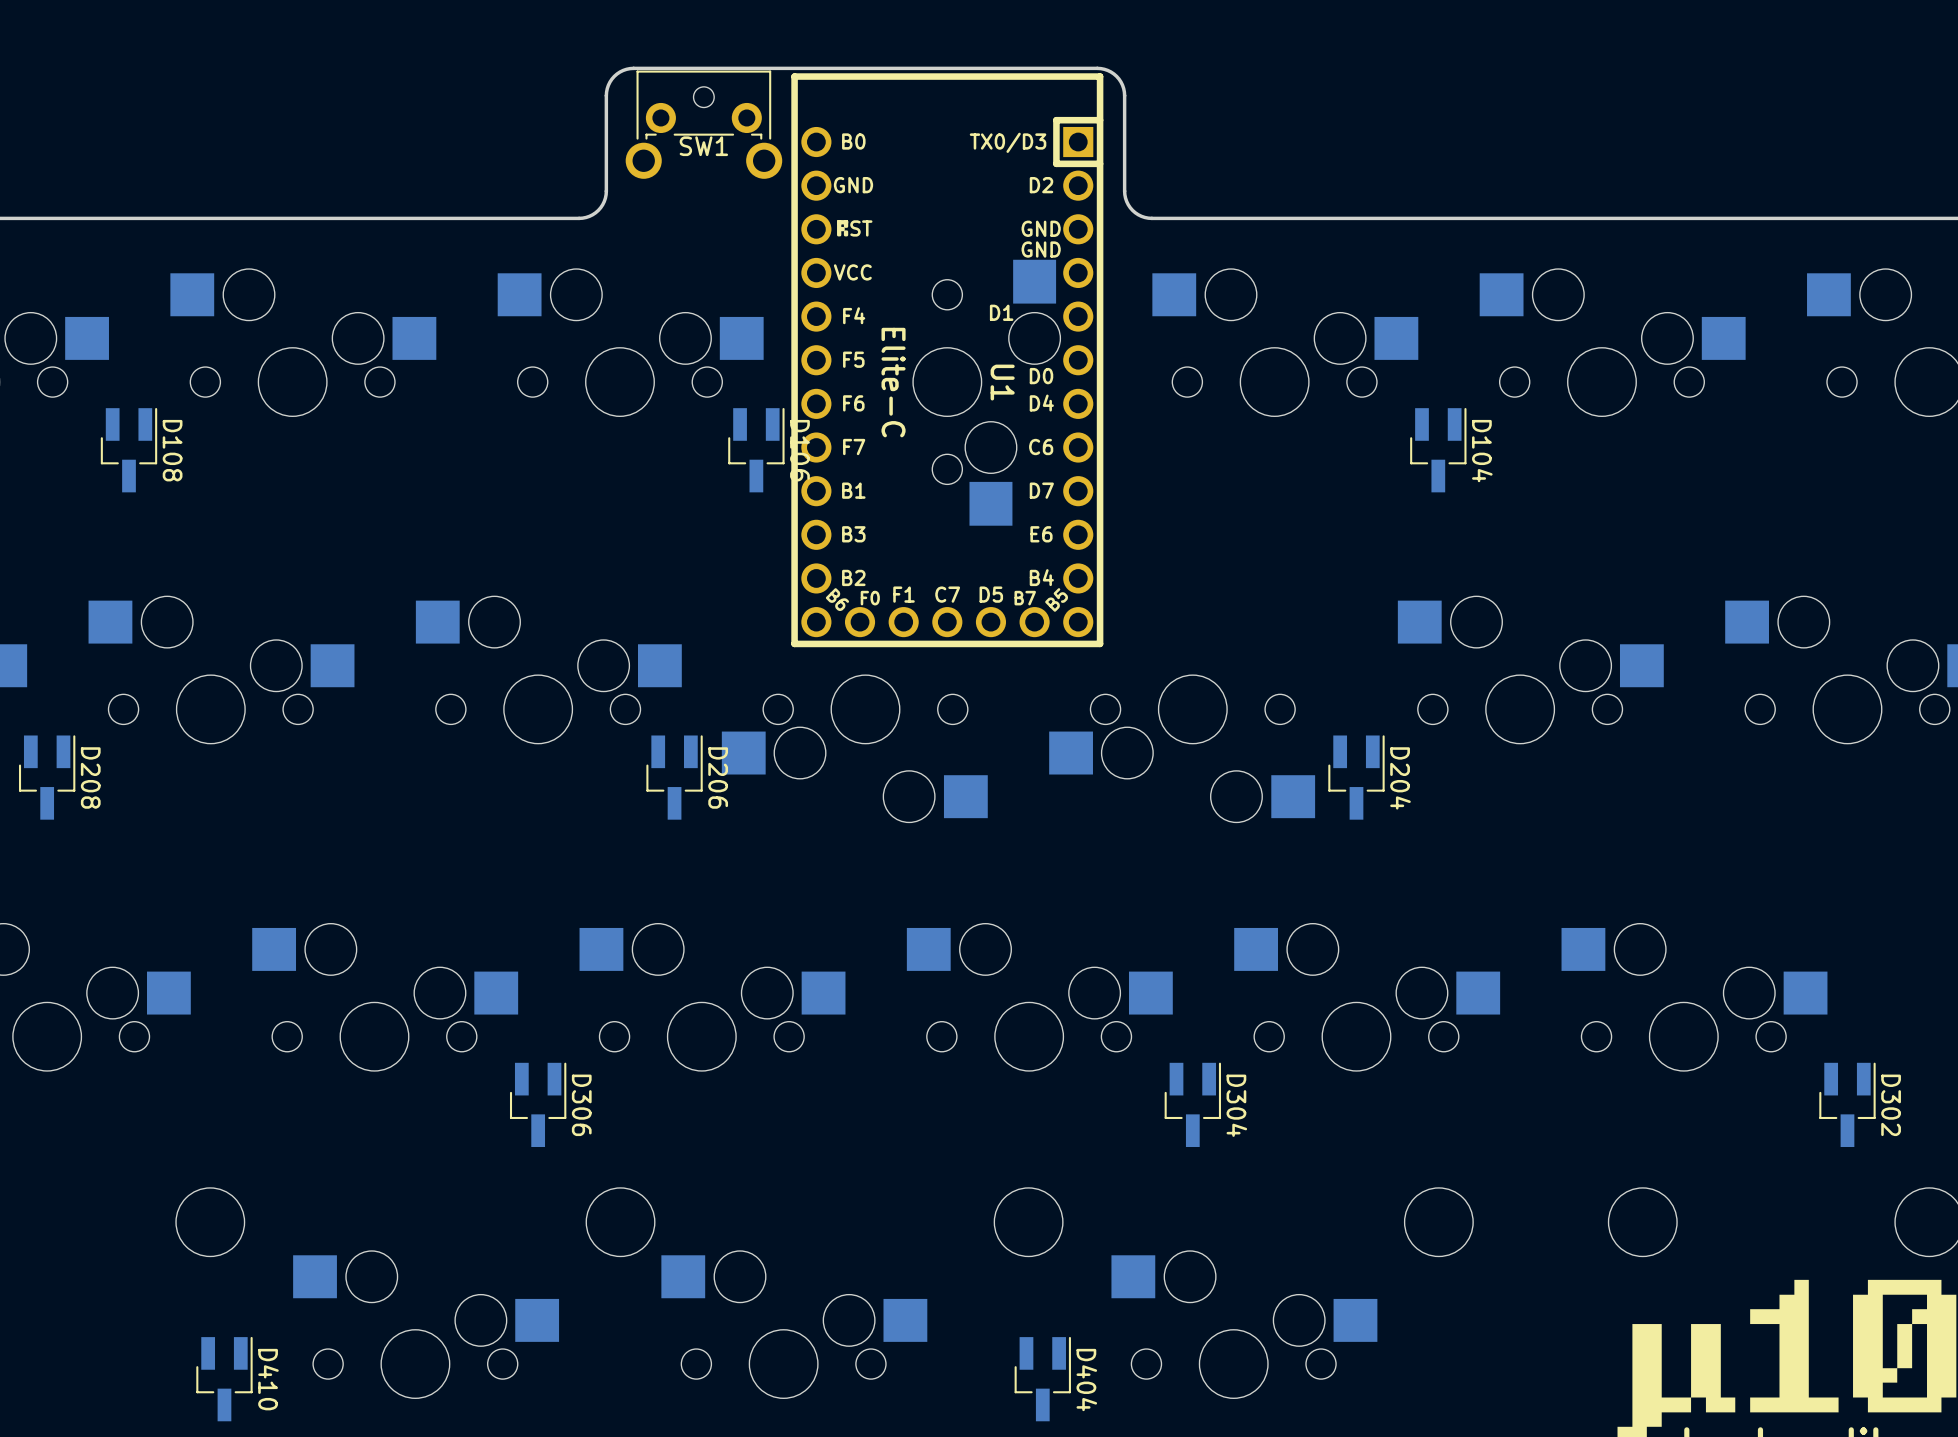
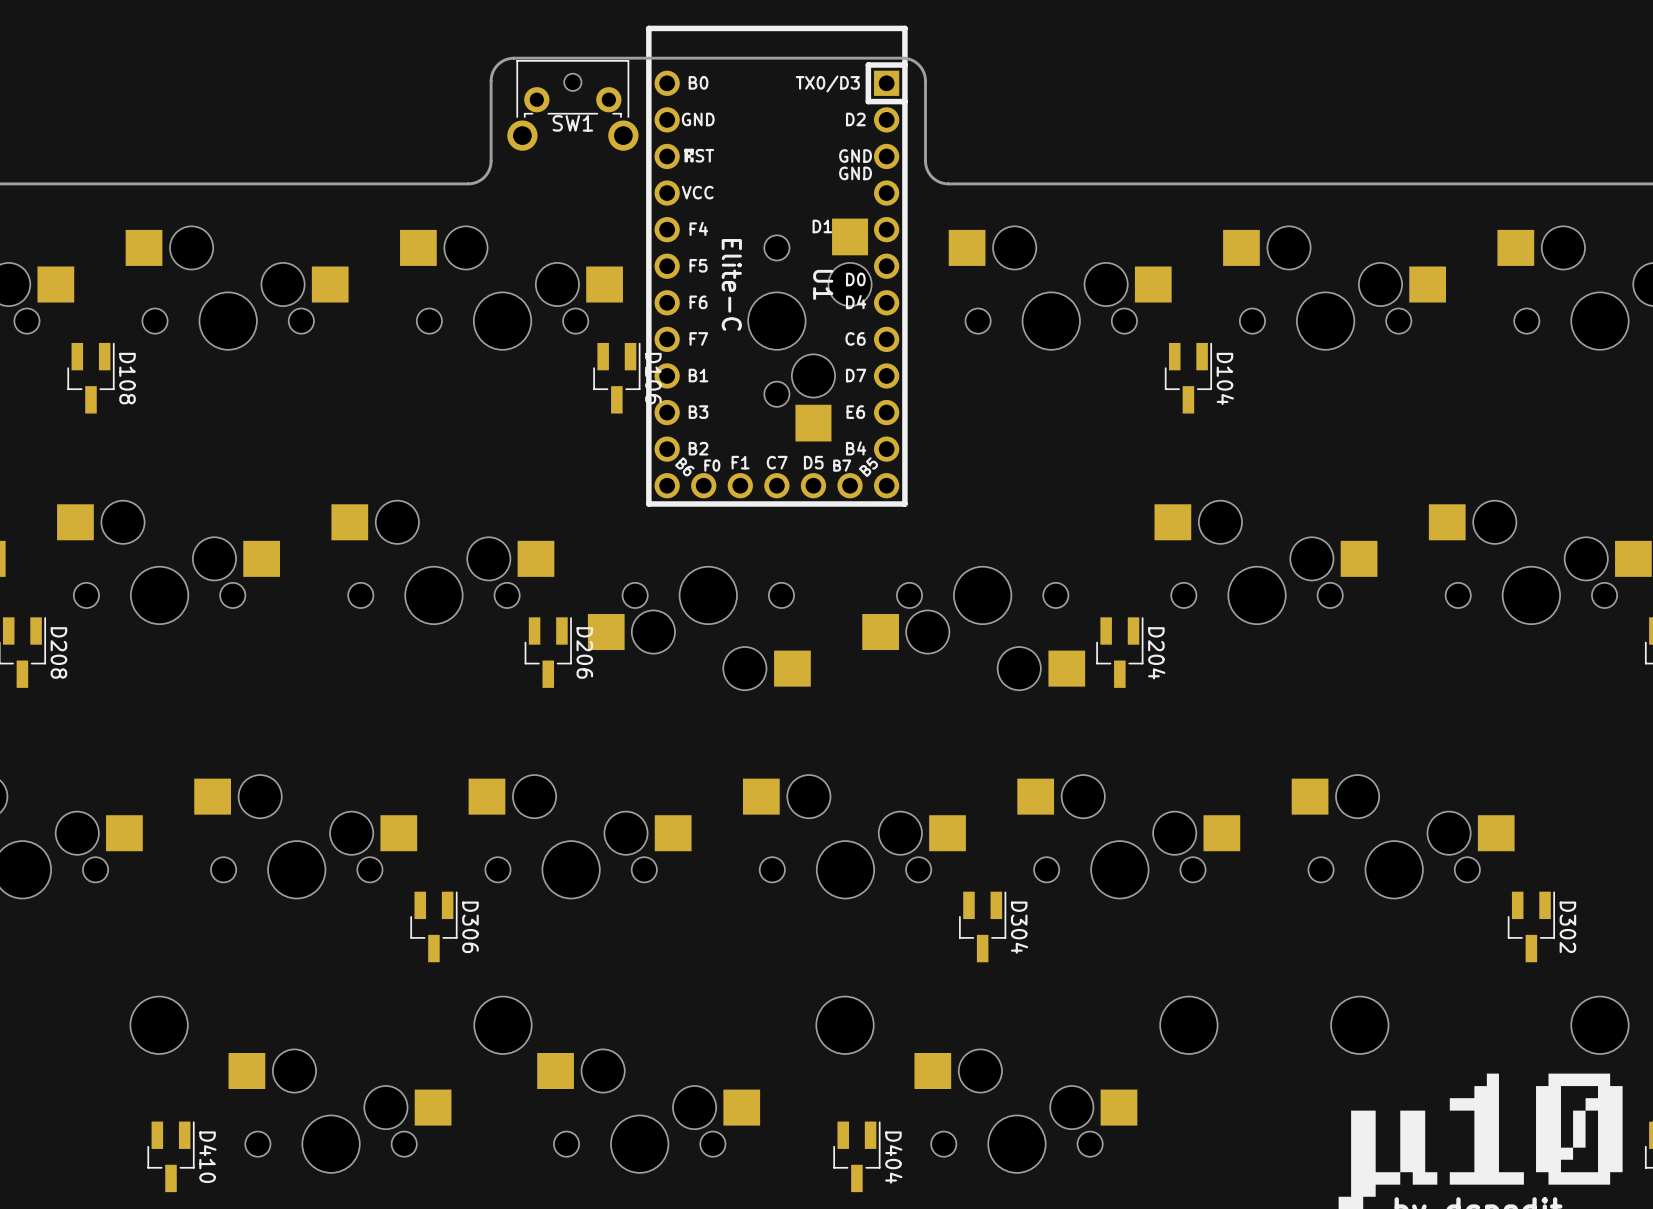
U1 position: (947, 360) -> (776, 266)

